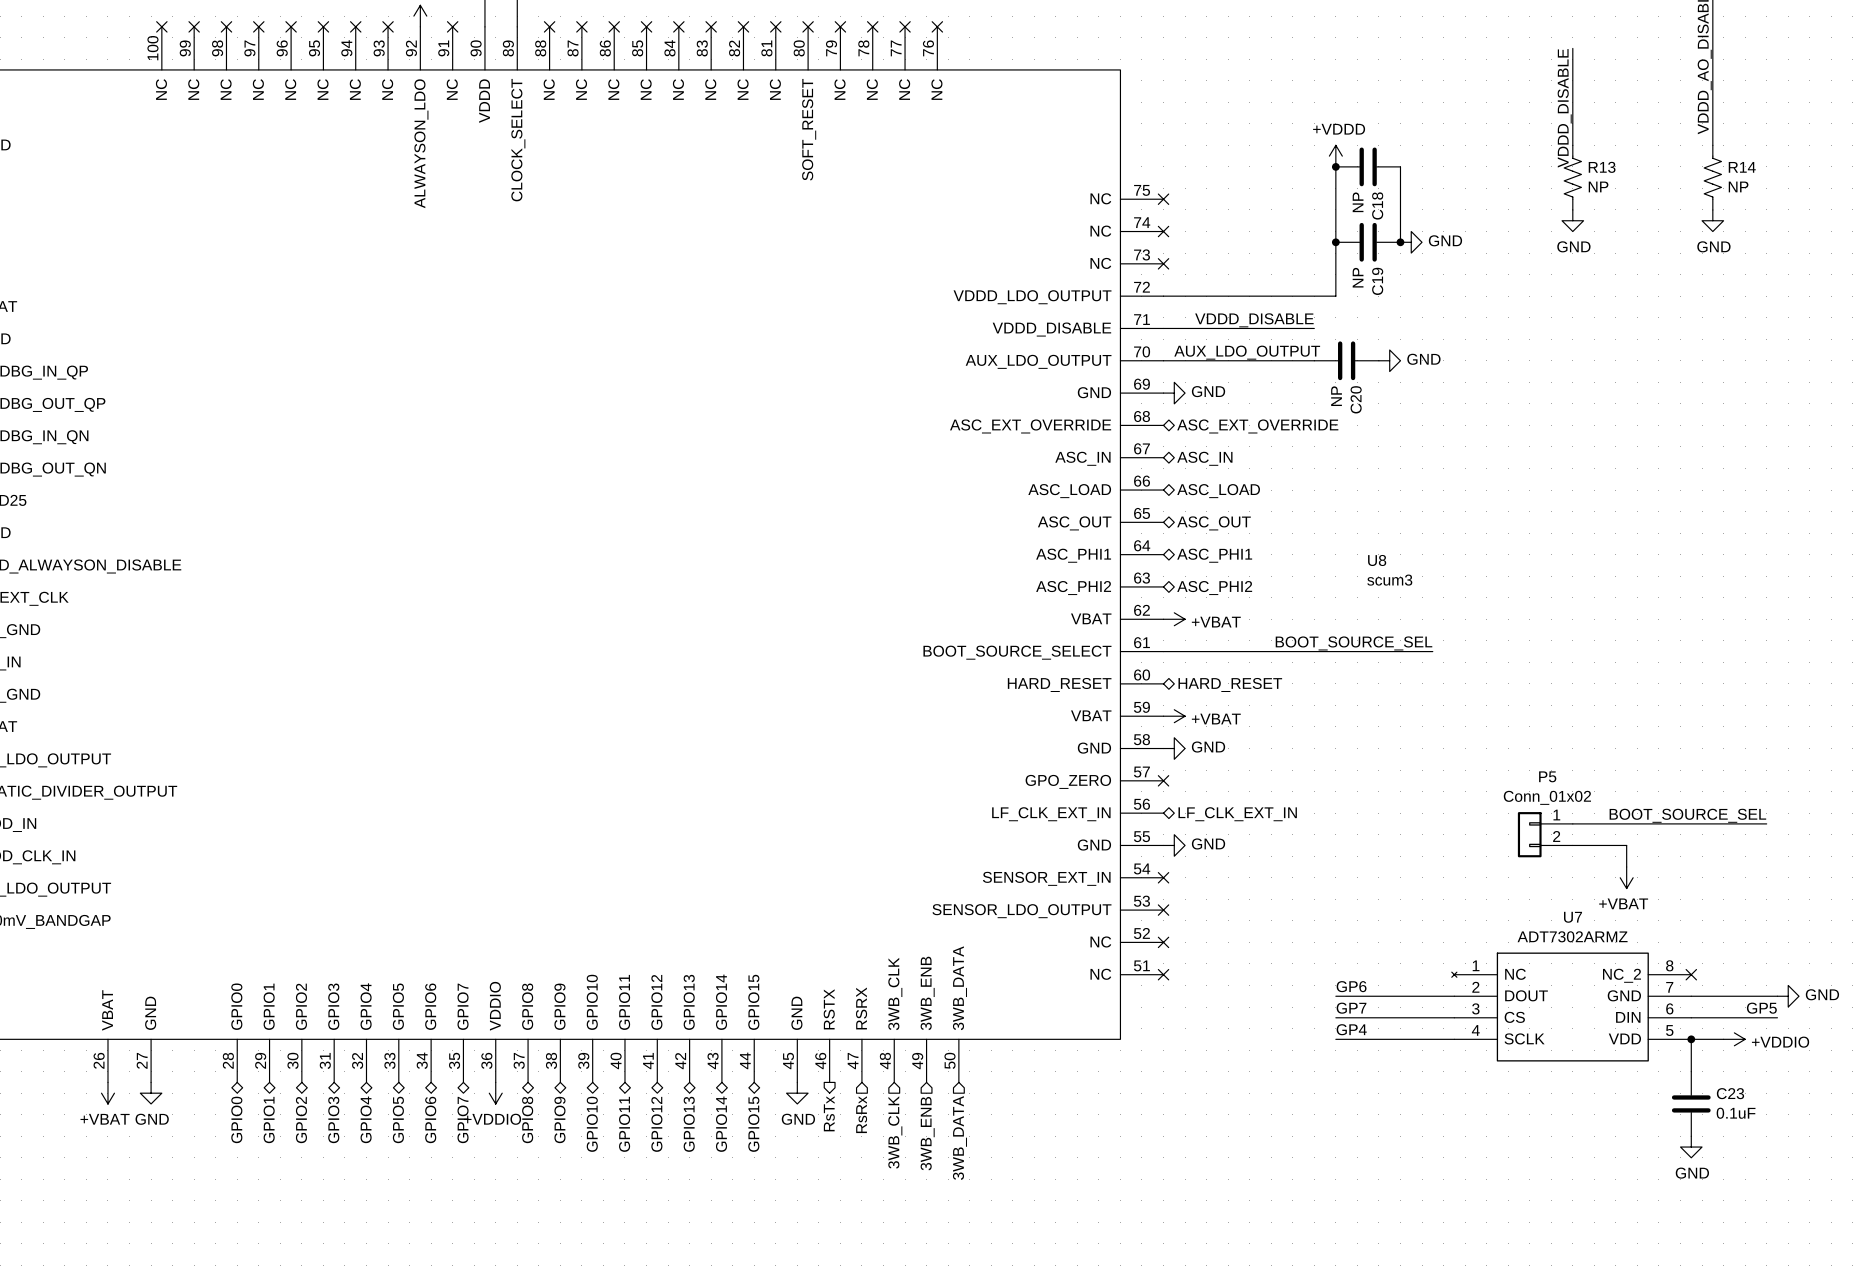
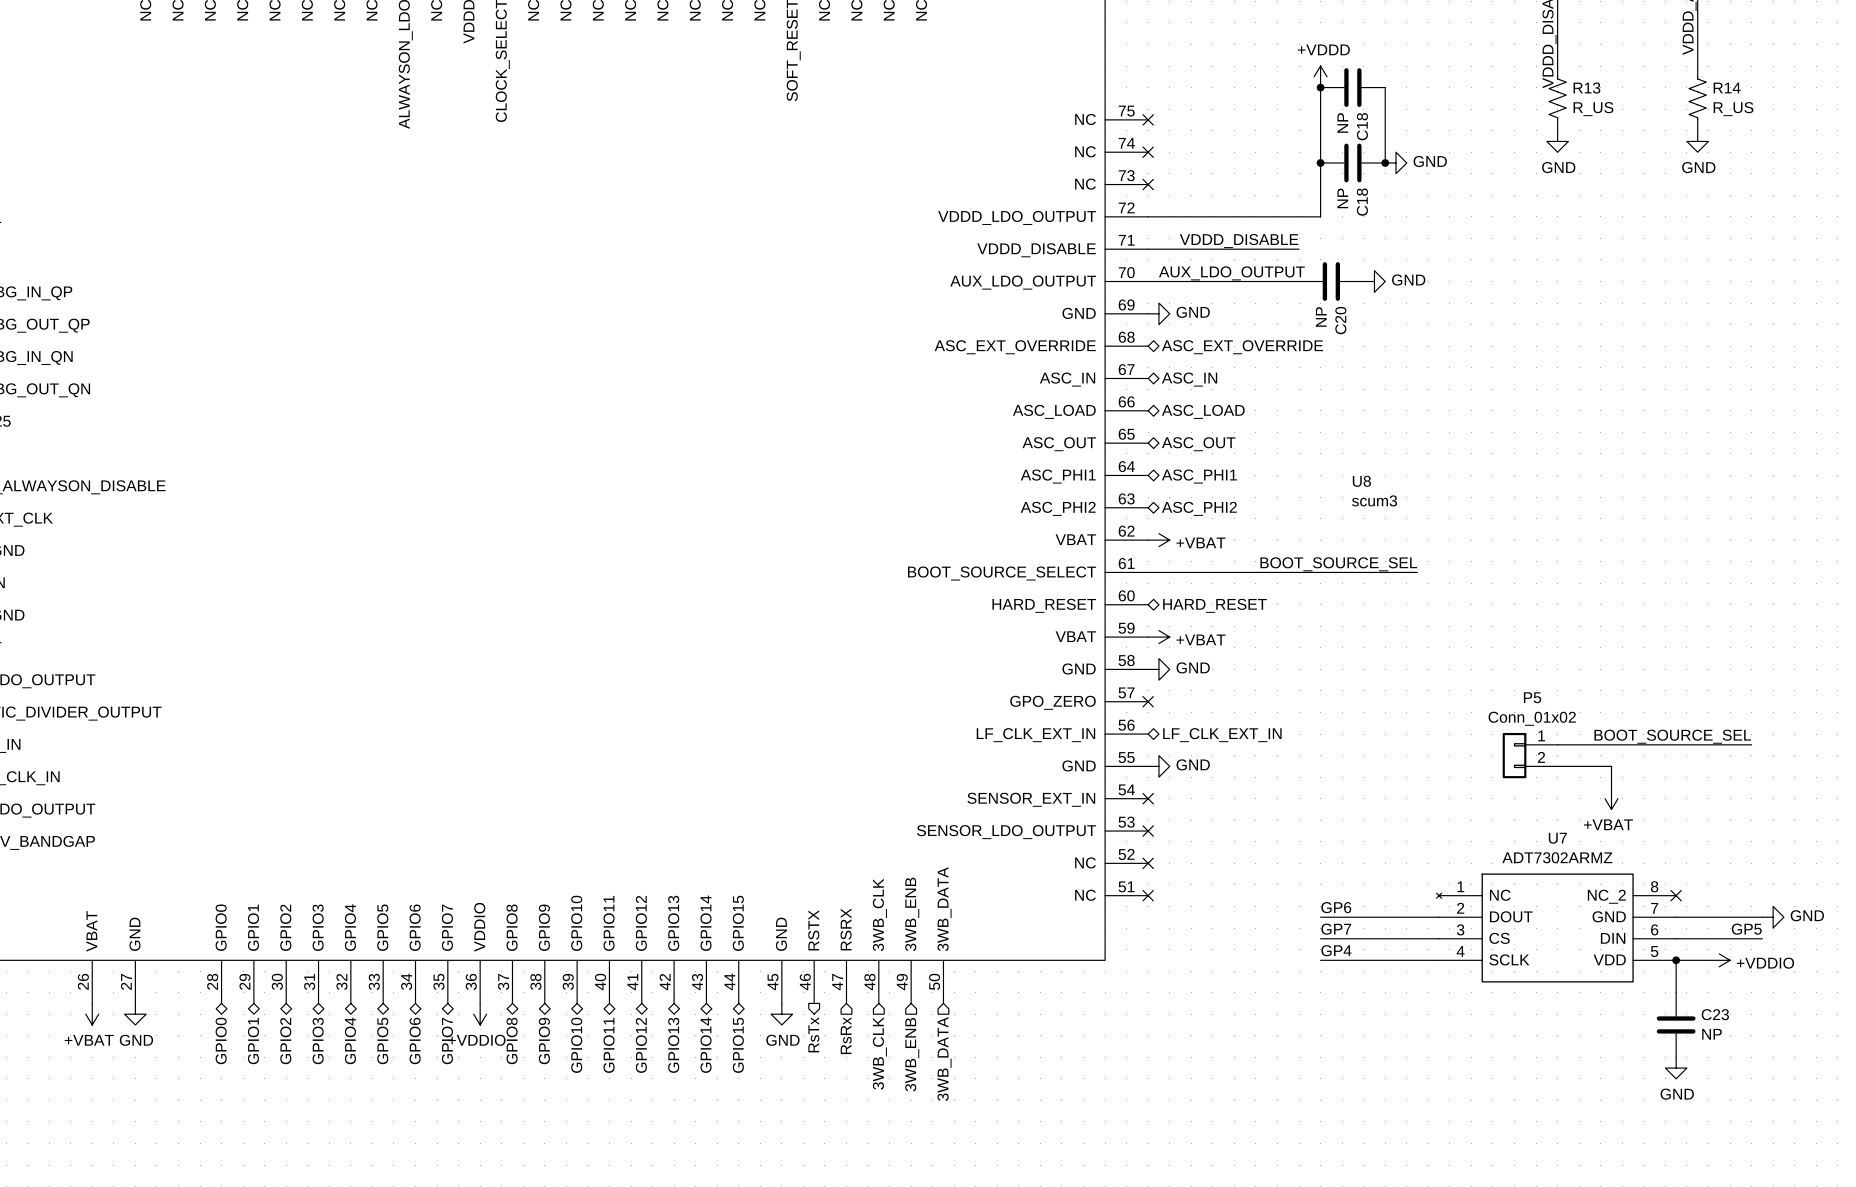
R13 value: NP (1598, 186) -> R_US (1593, 109)
R14 value: NP (1738, 186) -> R_US (1733, 109)
C19 name: C19 (1377, 281) -> C18 (1362, 202)
C23 value: 0.1uF (1736, 1113) -> NP (1712, 1034)

